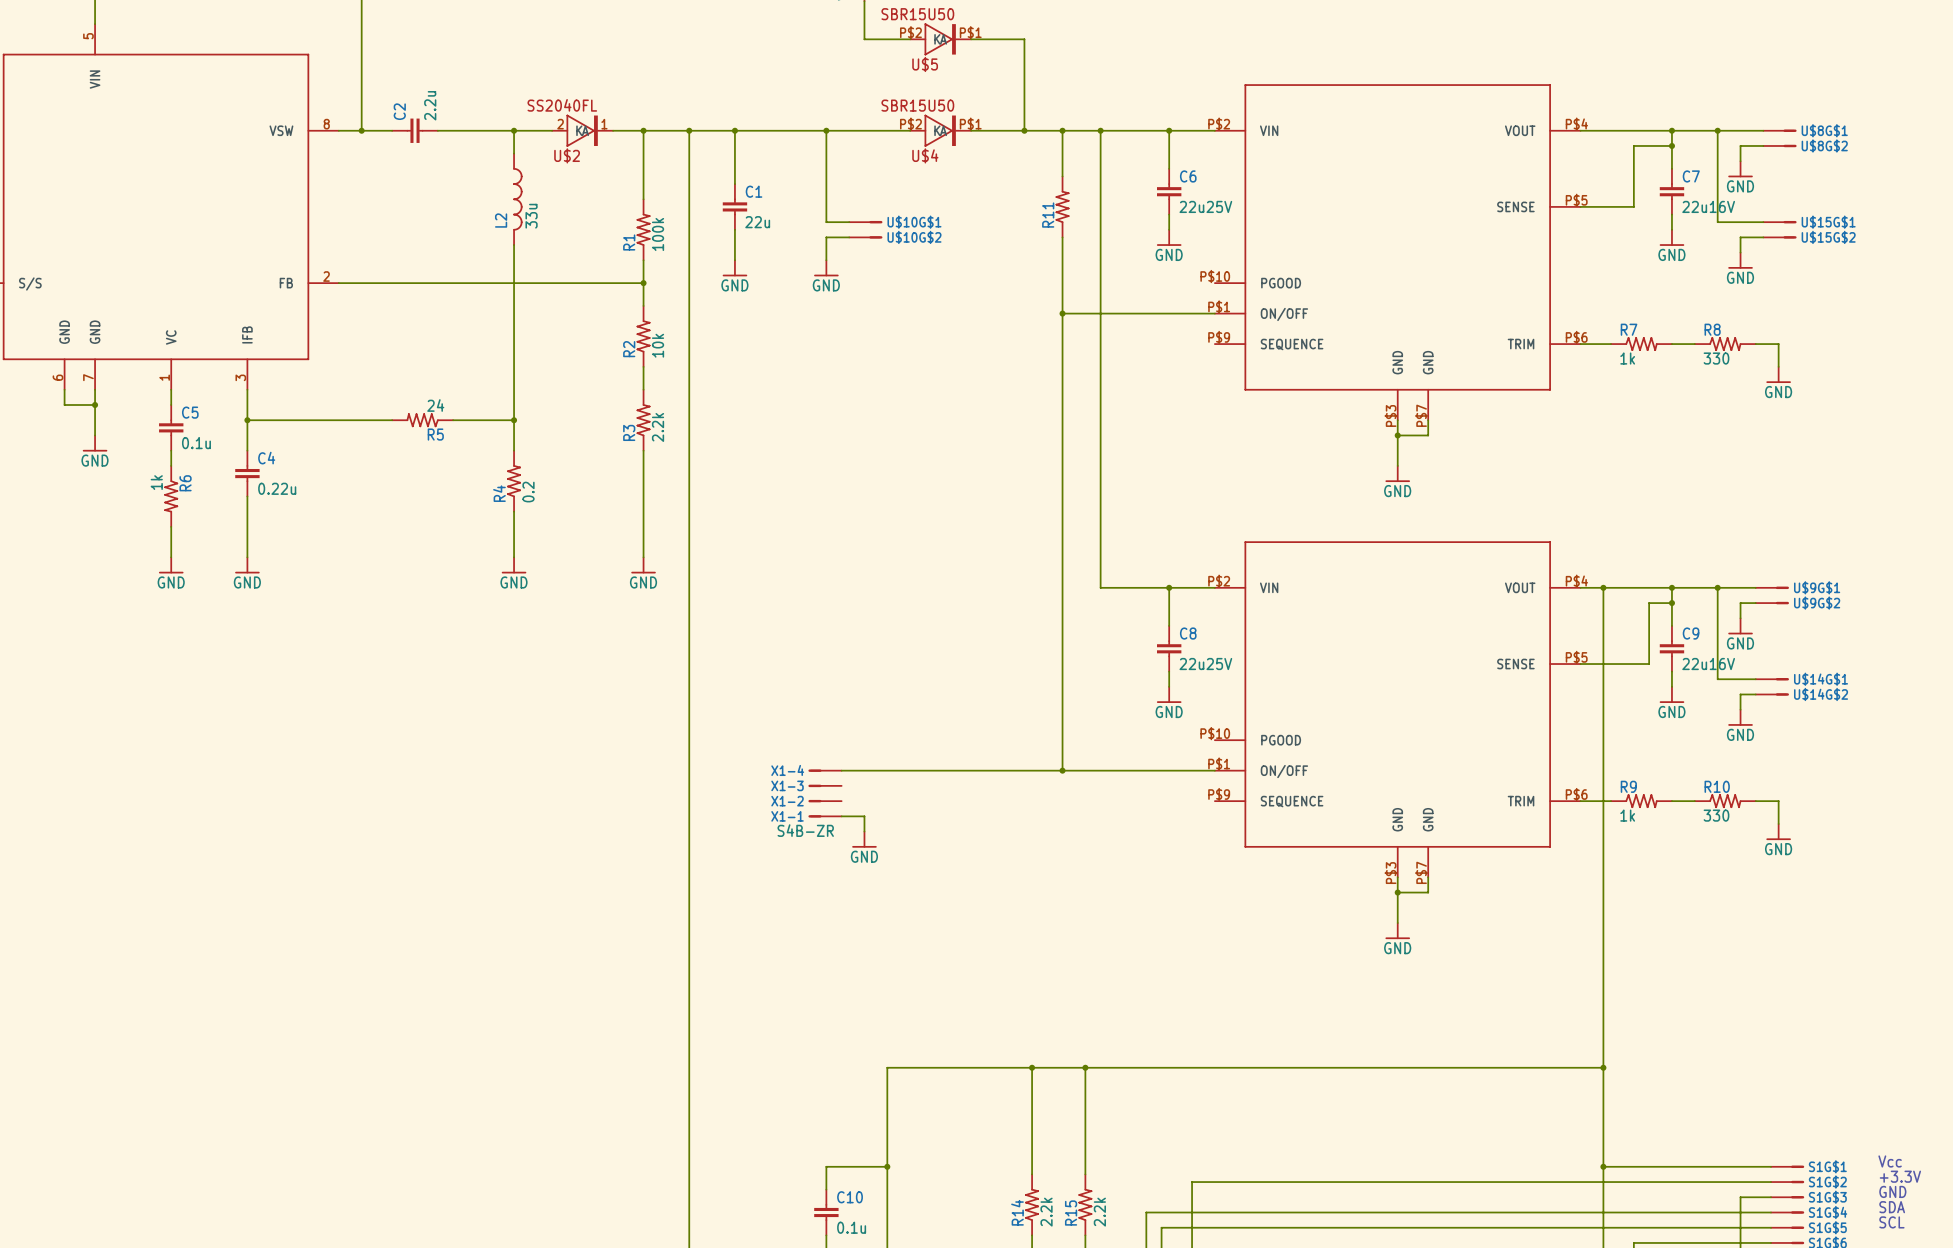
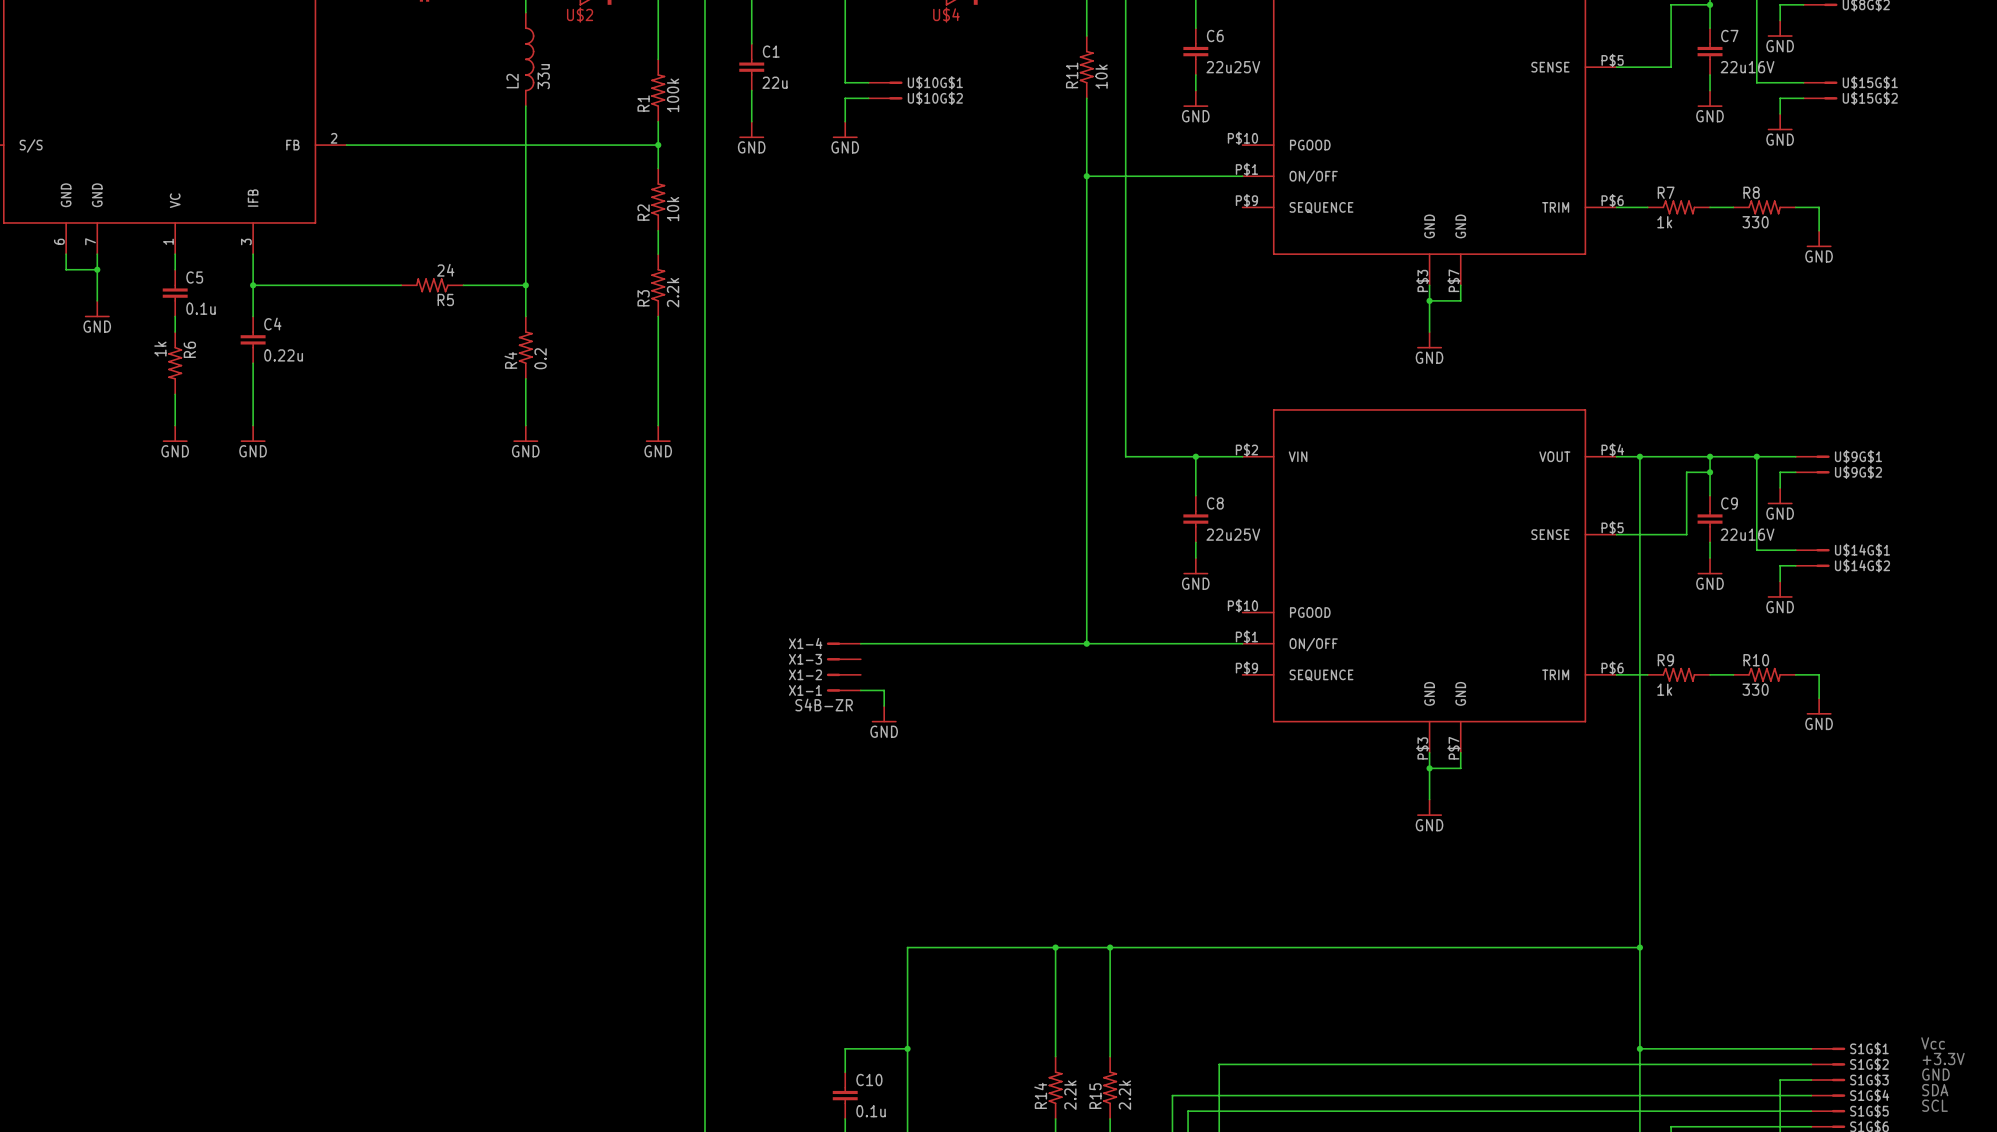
R11 value: none -> 10k (1101, 76)

